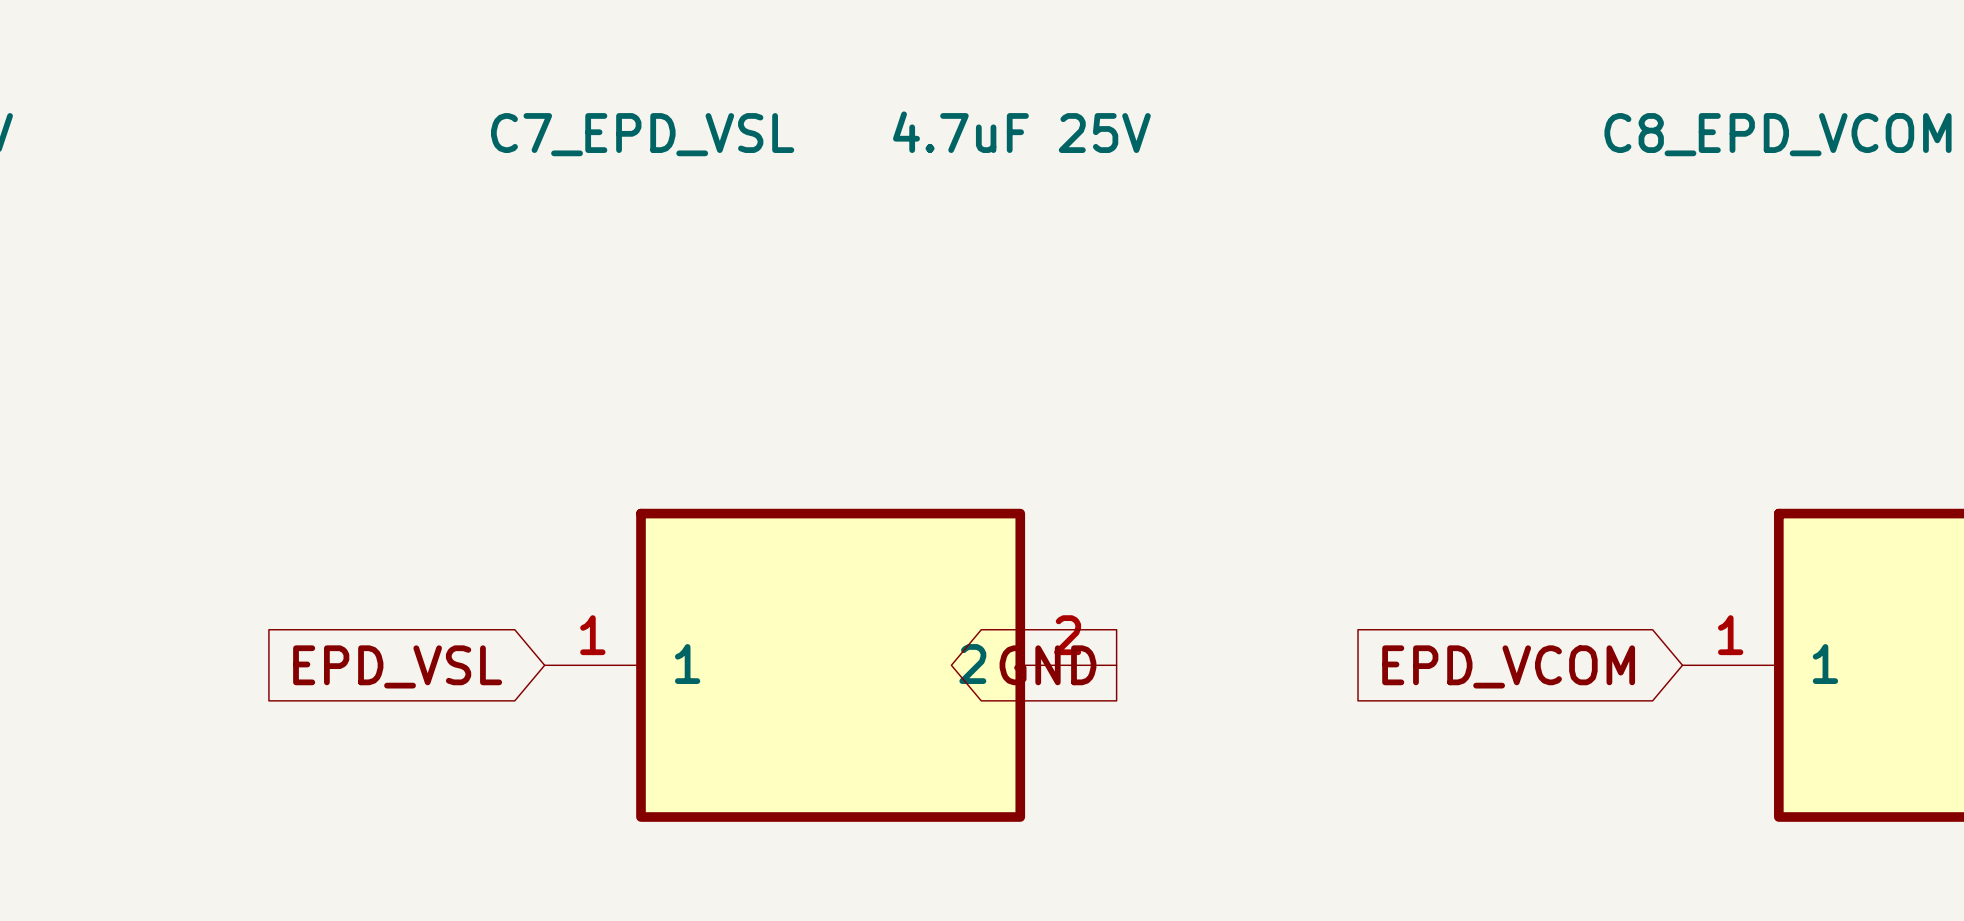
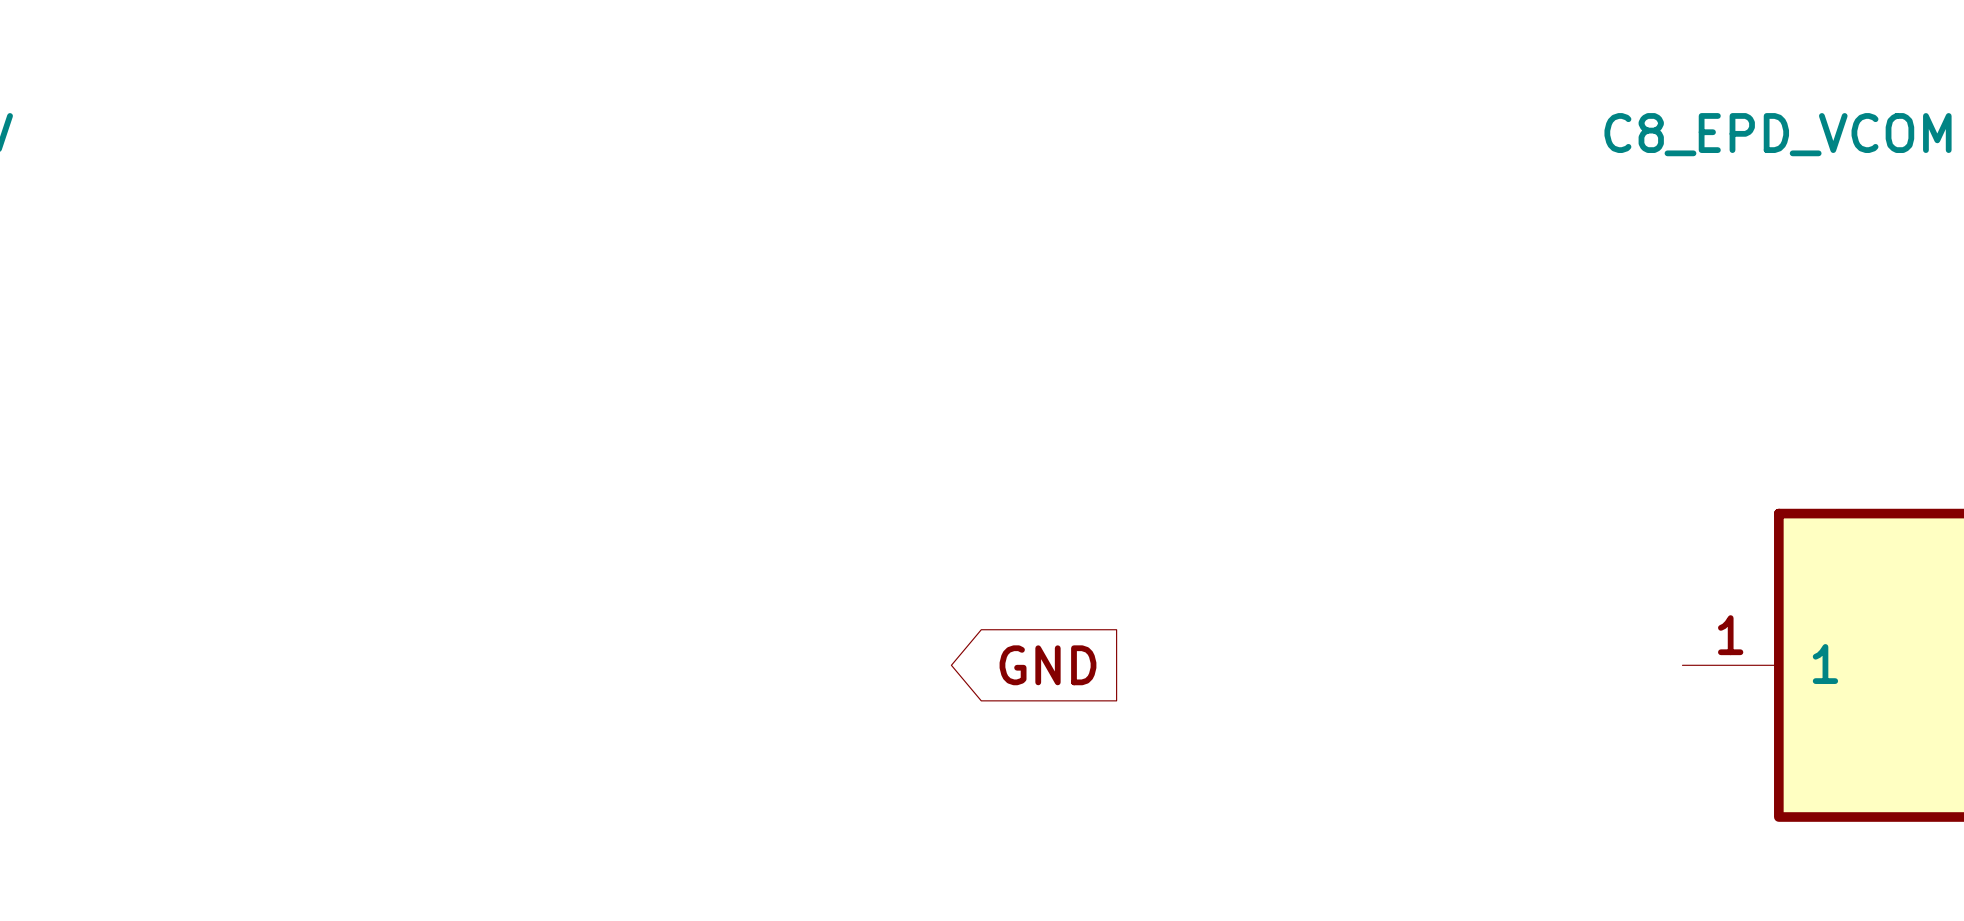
C7_EPD_VSL: 4.7uF 25V (830, 665) -> none
global label: EPD_VSL (397, 666) -> none
global label: EPD_VCOM (1508, 666) -> none

